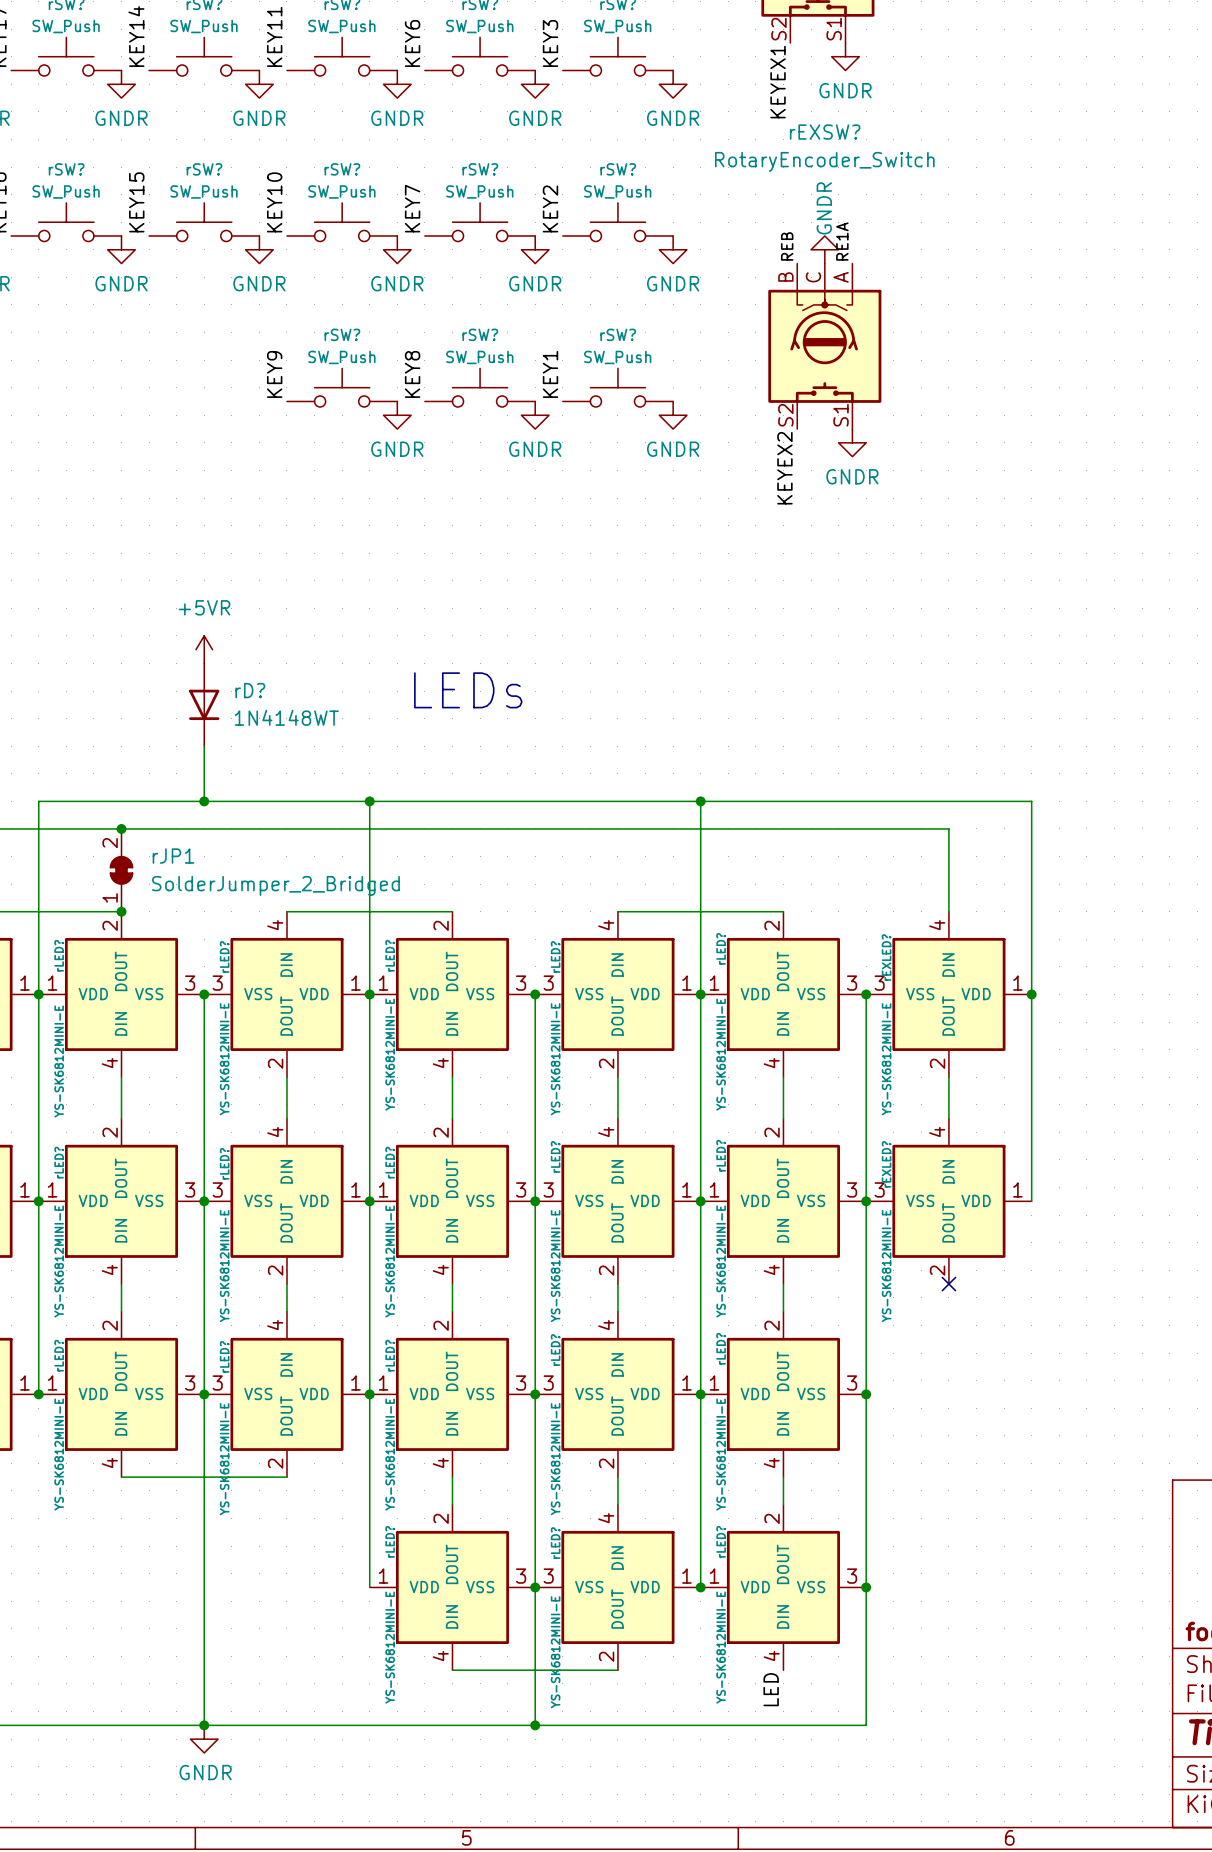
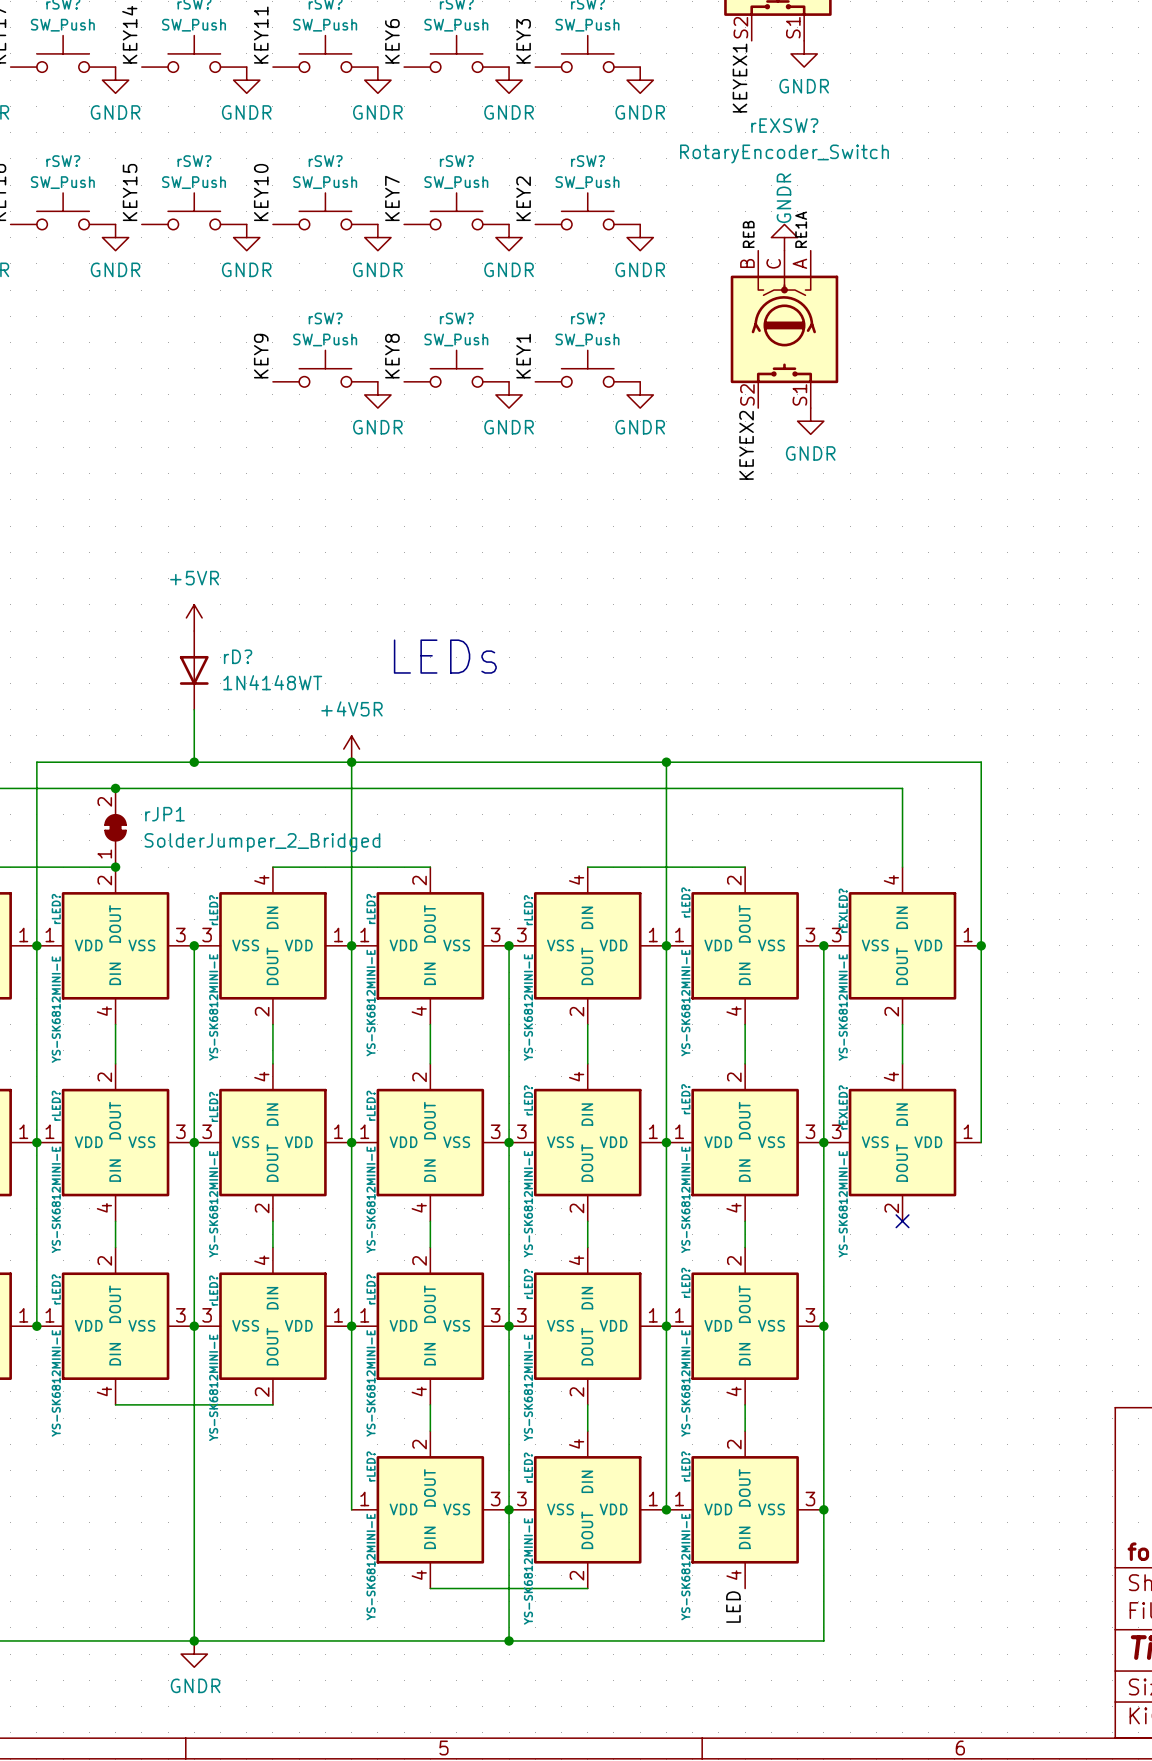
power symbol: none -> +4V5R (351, 749)

